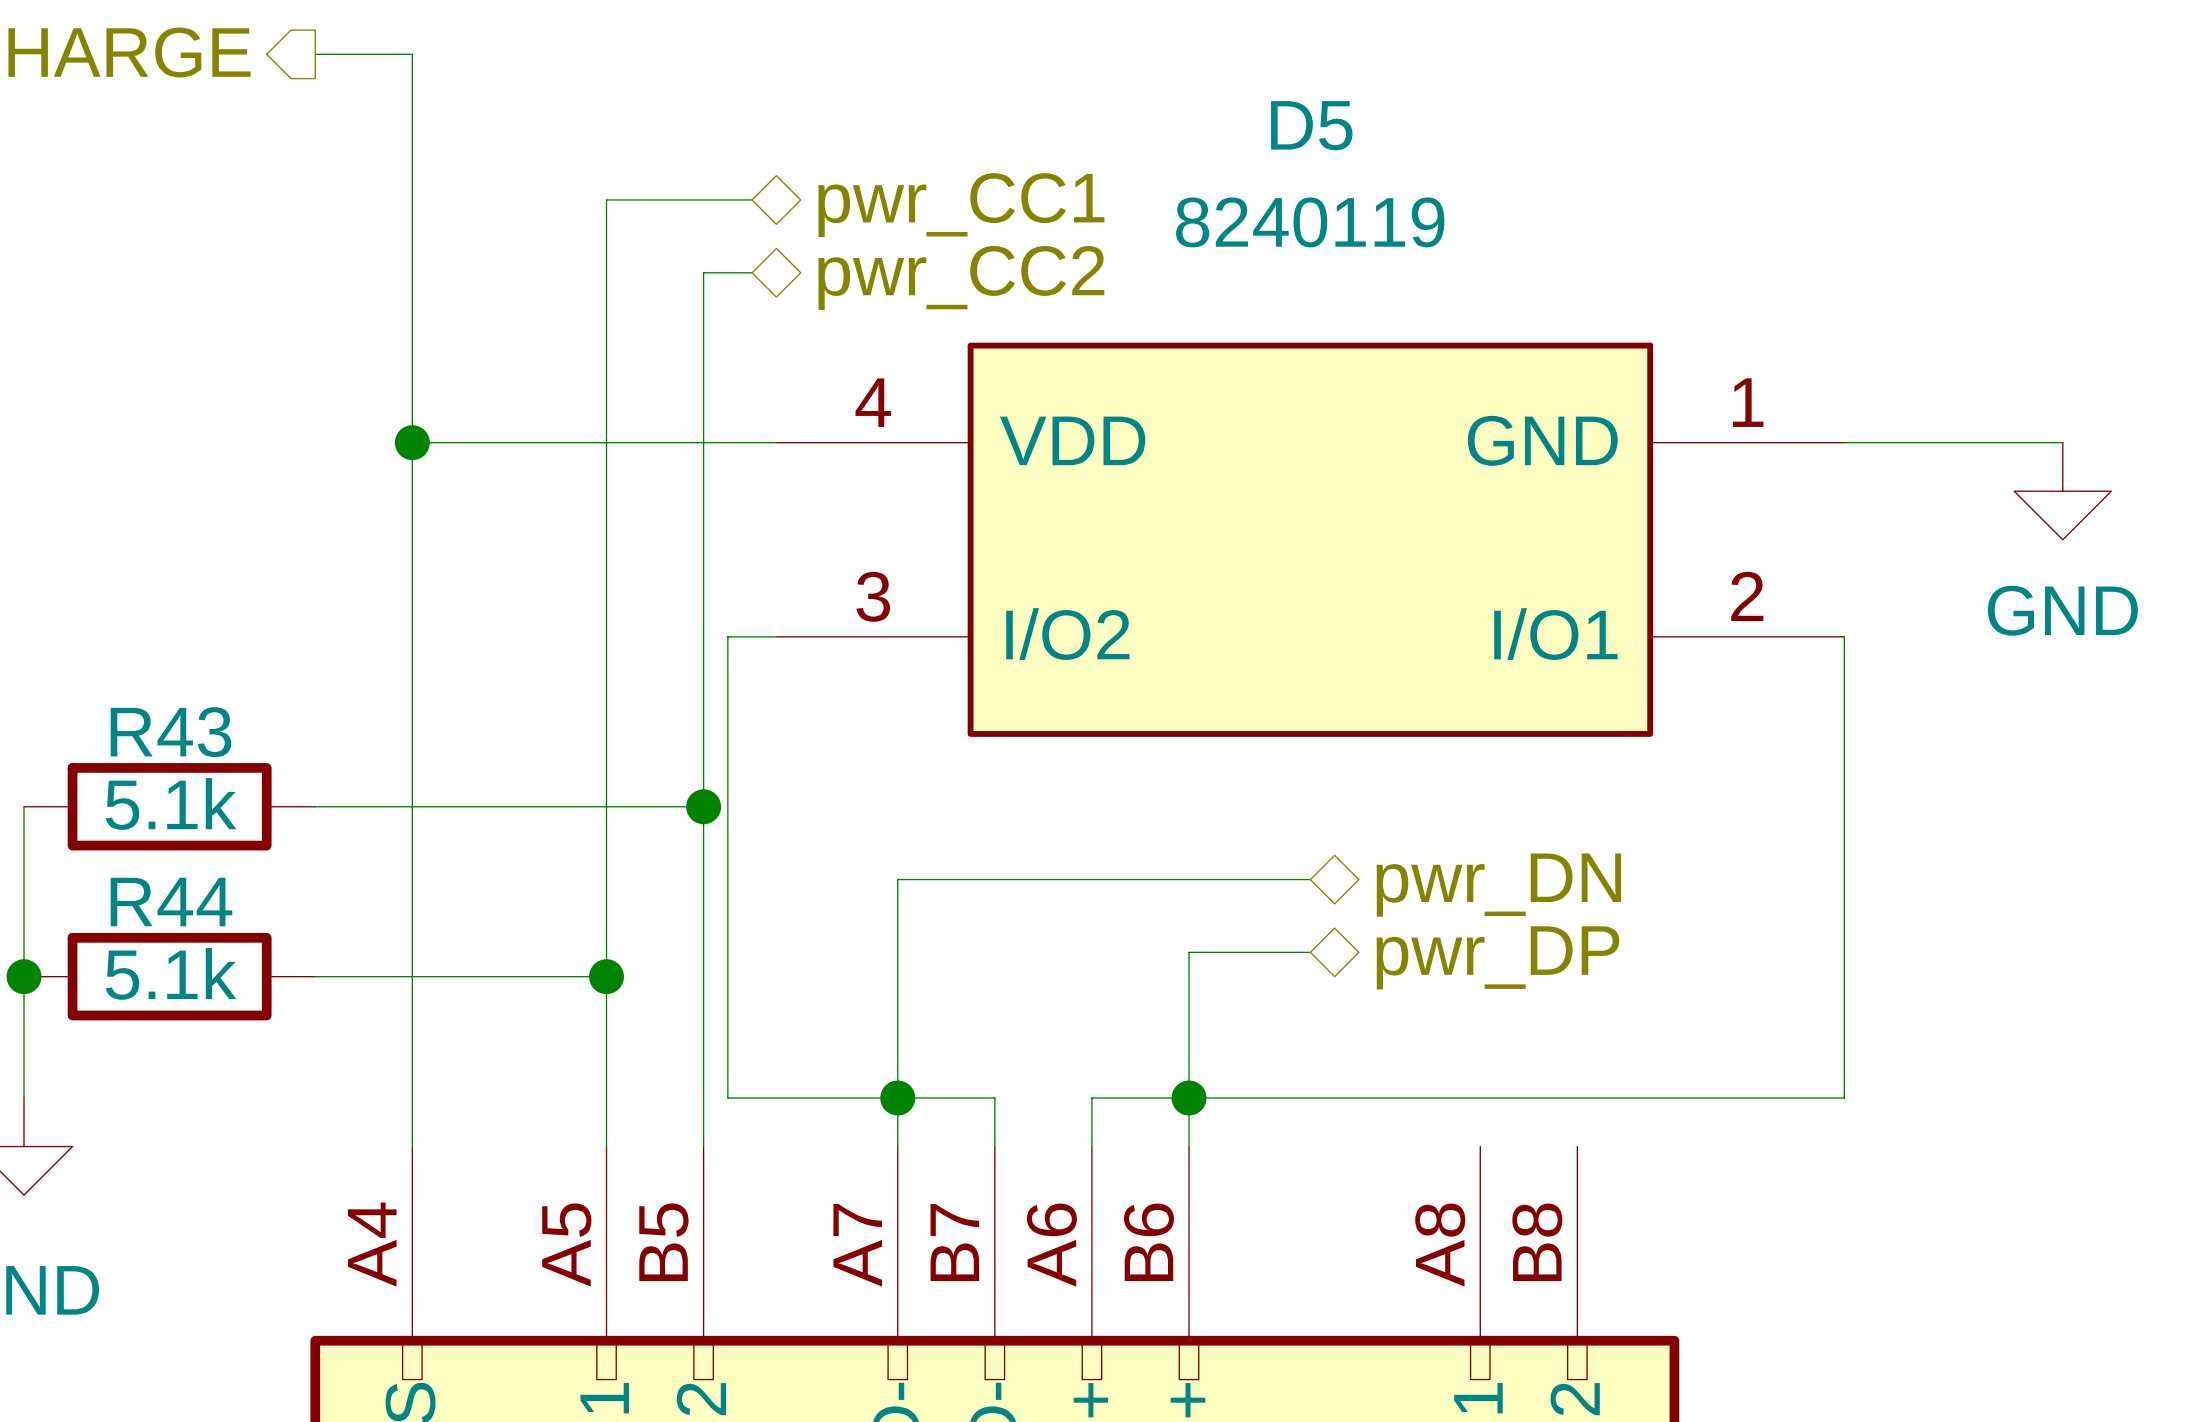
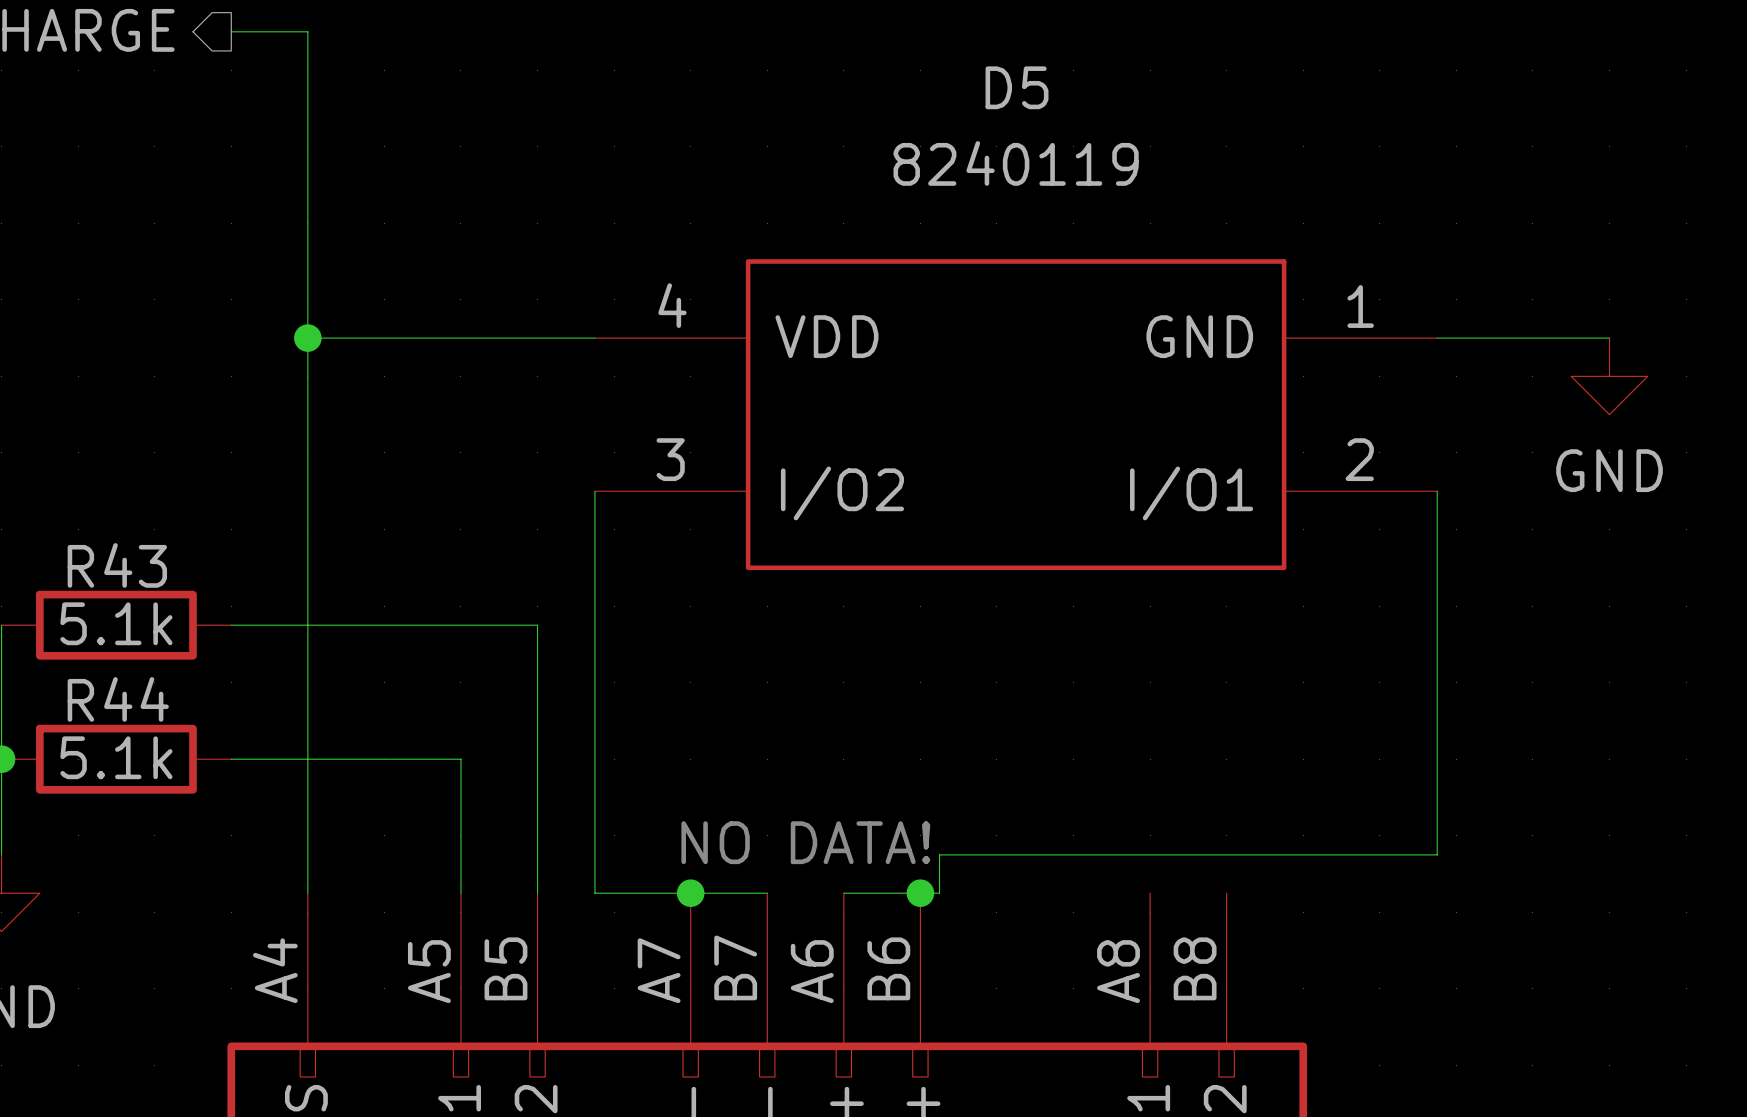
wire: (752, 199) (606, 199) (606, 976) -> none
hierarchical label: pwr_CC1 (961, 205) -> none
wire: (752, 272) (703, 272) (703, 806) -> none
hierarchical label: pwr_CC2 (961, 277) -> none
wire: (776, 636) (727, 636) (727, 1098) (994, 1098) (994, 1146) -> (594, 491) (594, 893) (767, 893)
junction: (703, 806) -> none
wire: (1310, 879) (897, 879) (897, 1146) -> none
hierarchical label: pwr_DN (1498, 885) -> none
wire: (1310, 952) (1189, 952) (1189, 1146) -> none
hierarchical label: pwr_DP (1497, 957) -> none
junction: (606, 976) -> none
text: none -> NO DATA! (805, 842)
junction position: (897, 1098) -> (690, 893)
junction position: (1189, 1098) -> (920, 893)
wire: (1213, 1098) (1091, 1098) (1091, 1146) -> (939, 854) (939, 893) (843, 893)

